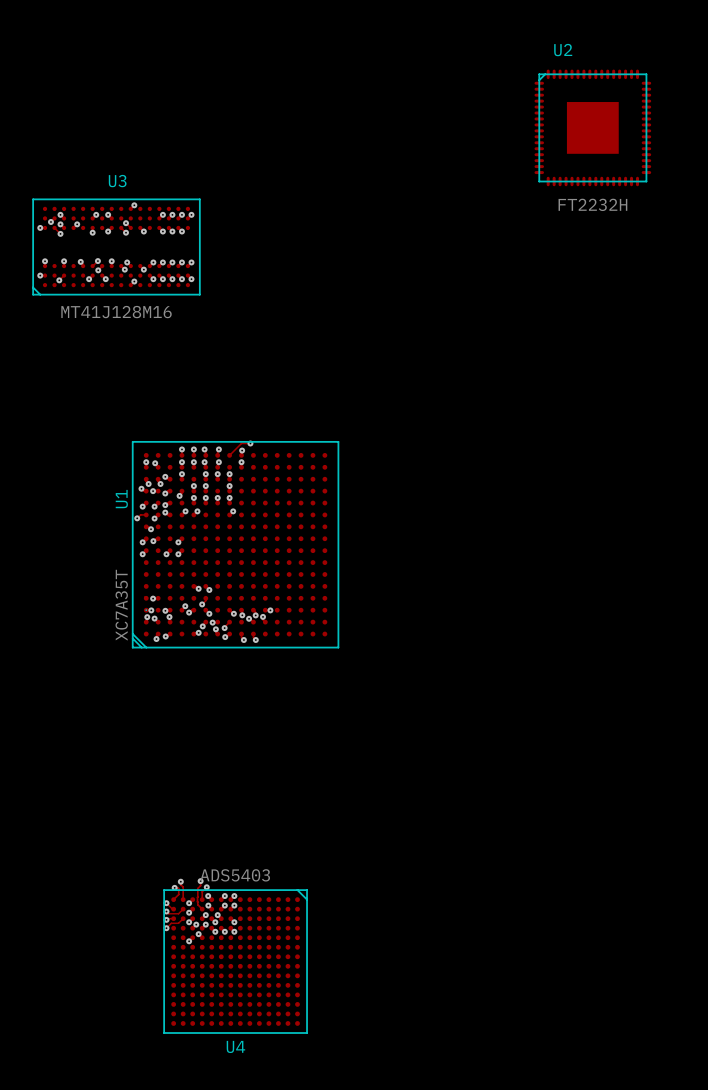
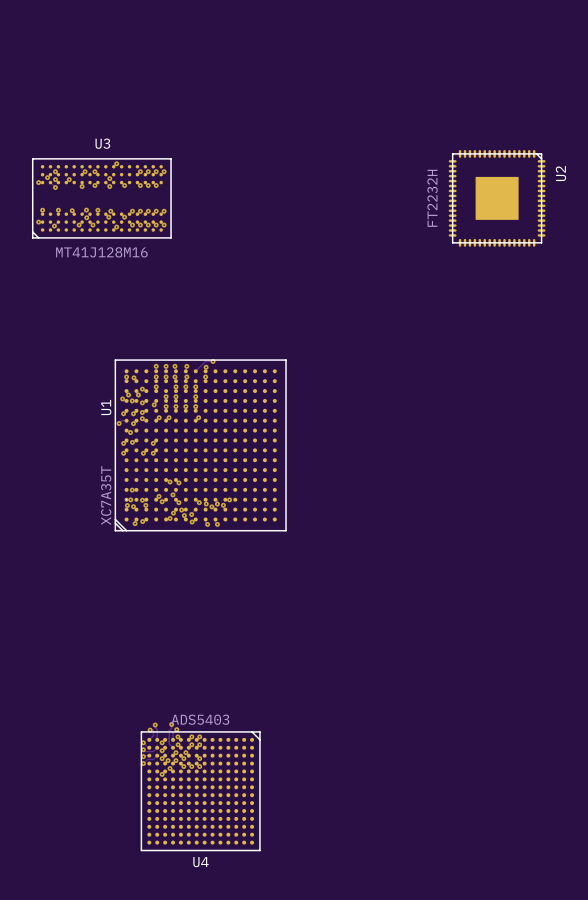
U2 rotation: 0° (592, 127) -> 90° clockwise (497, 198)
U2 position: (592, 127) -> (497, 198)

